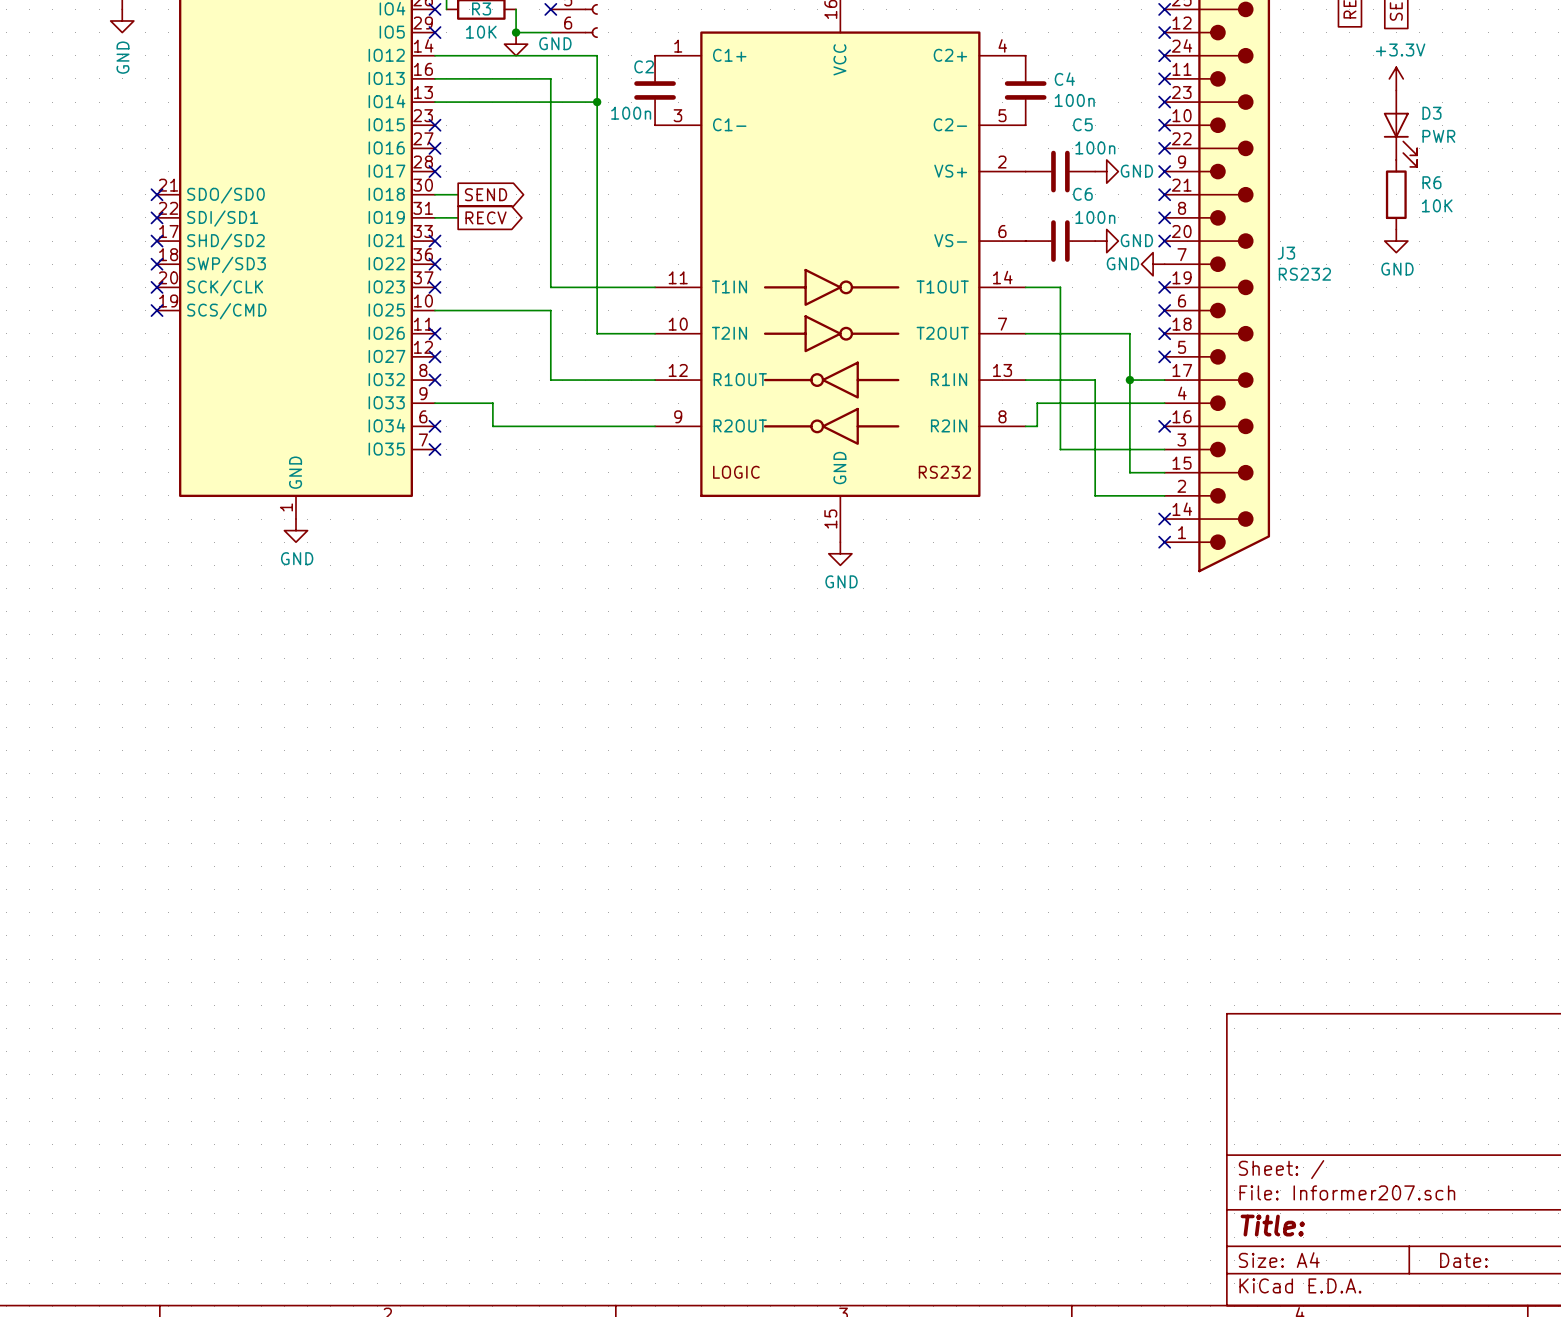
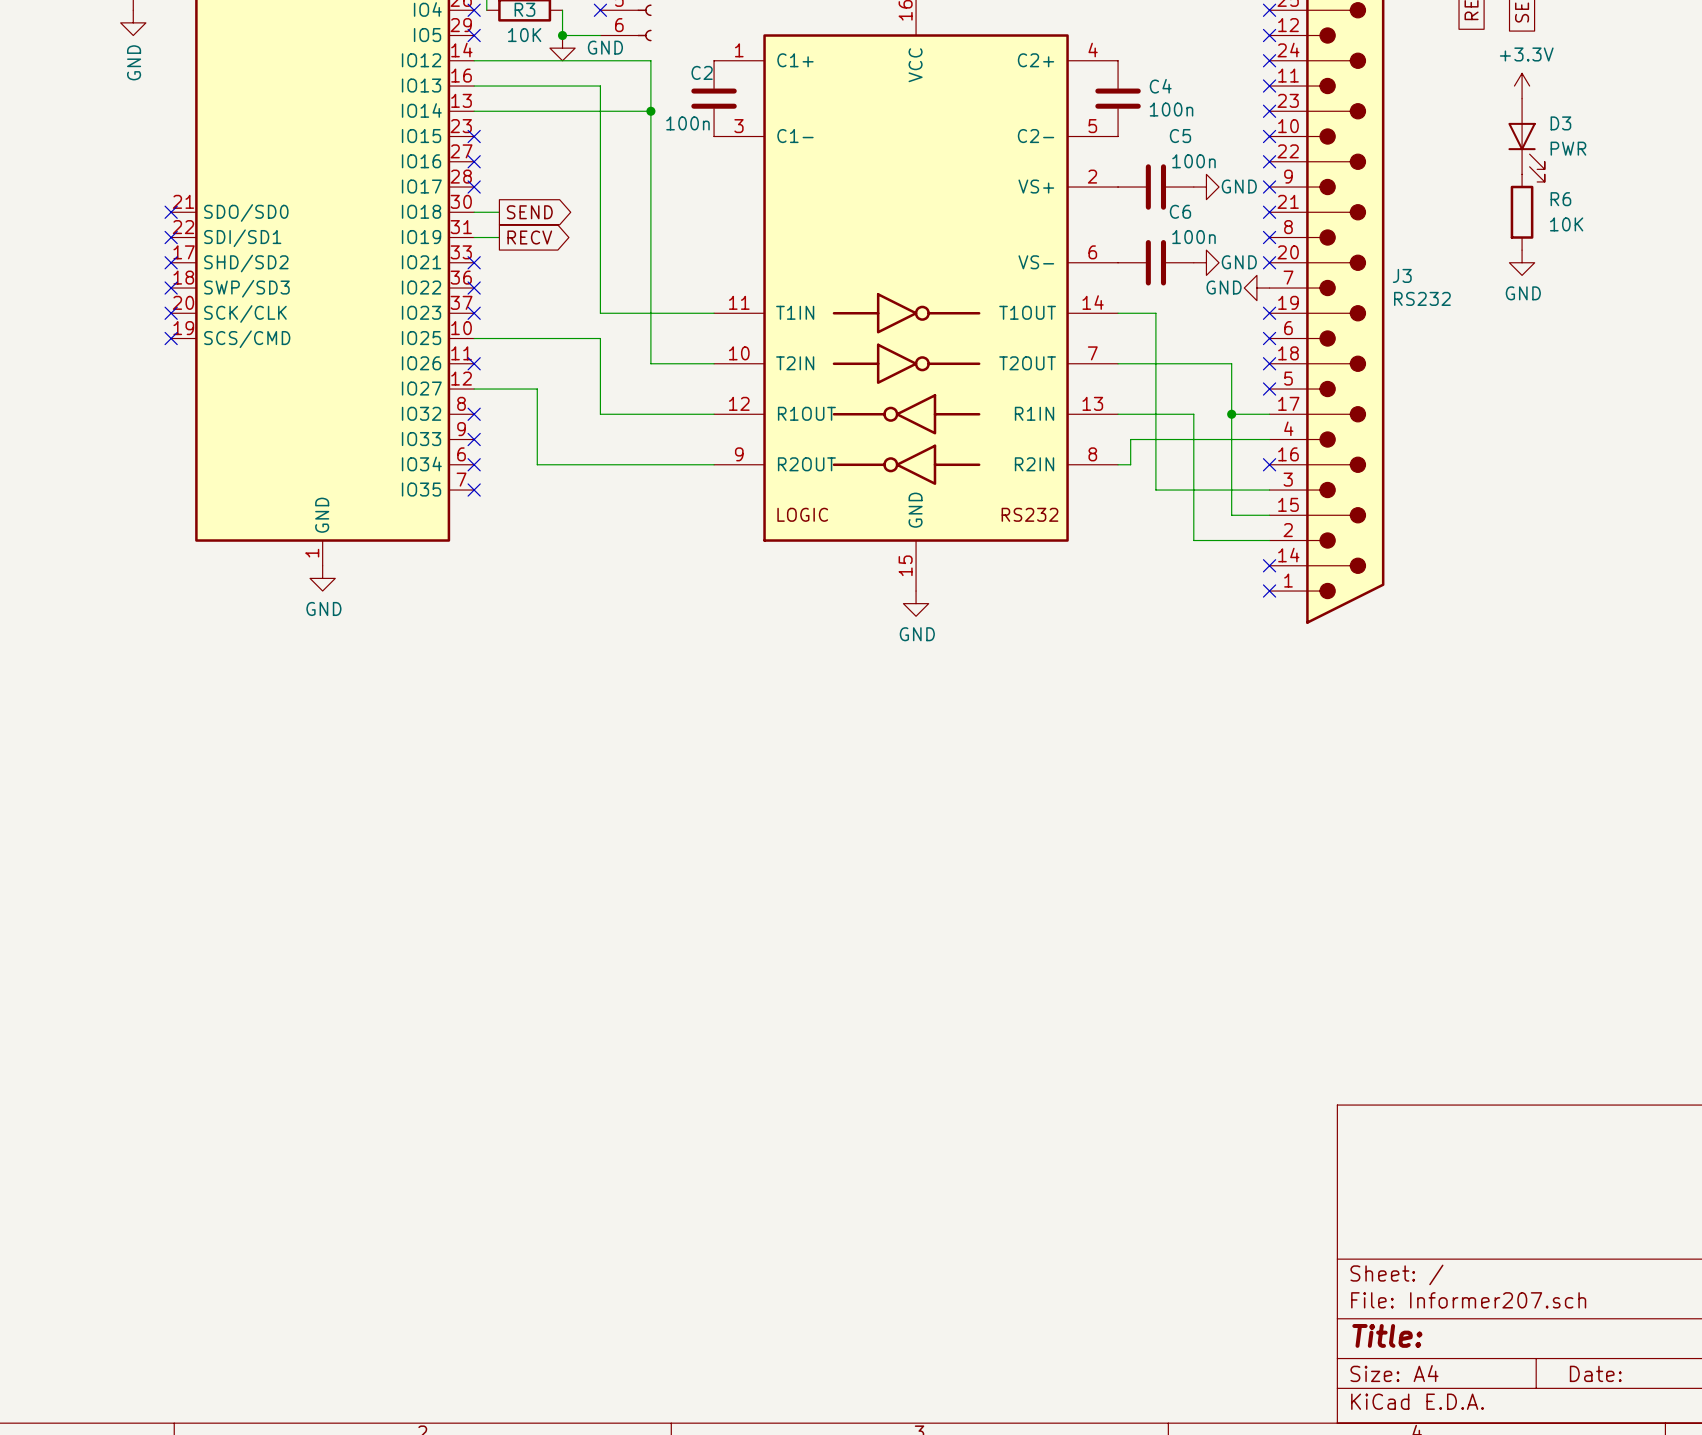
no-connect mark position: (434, 356) -> (474, 439)
wire: (434, 403) (492, 403) -> (474, 389) (537, 389) (537, 439)

